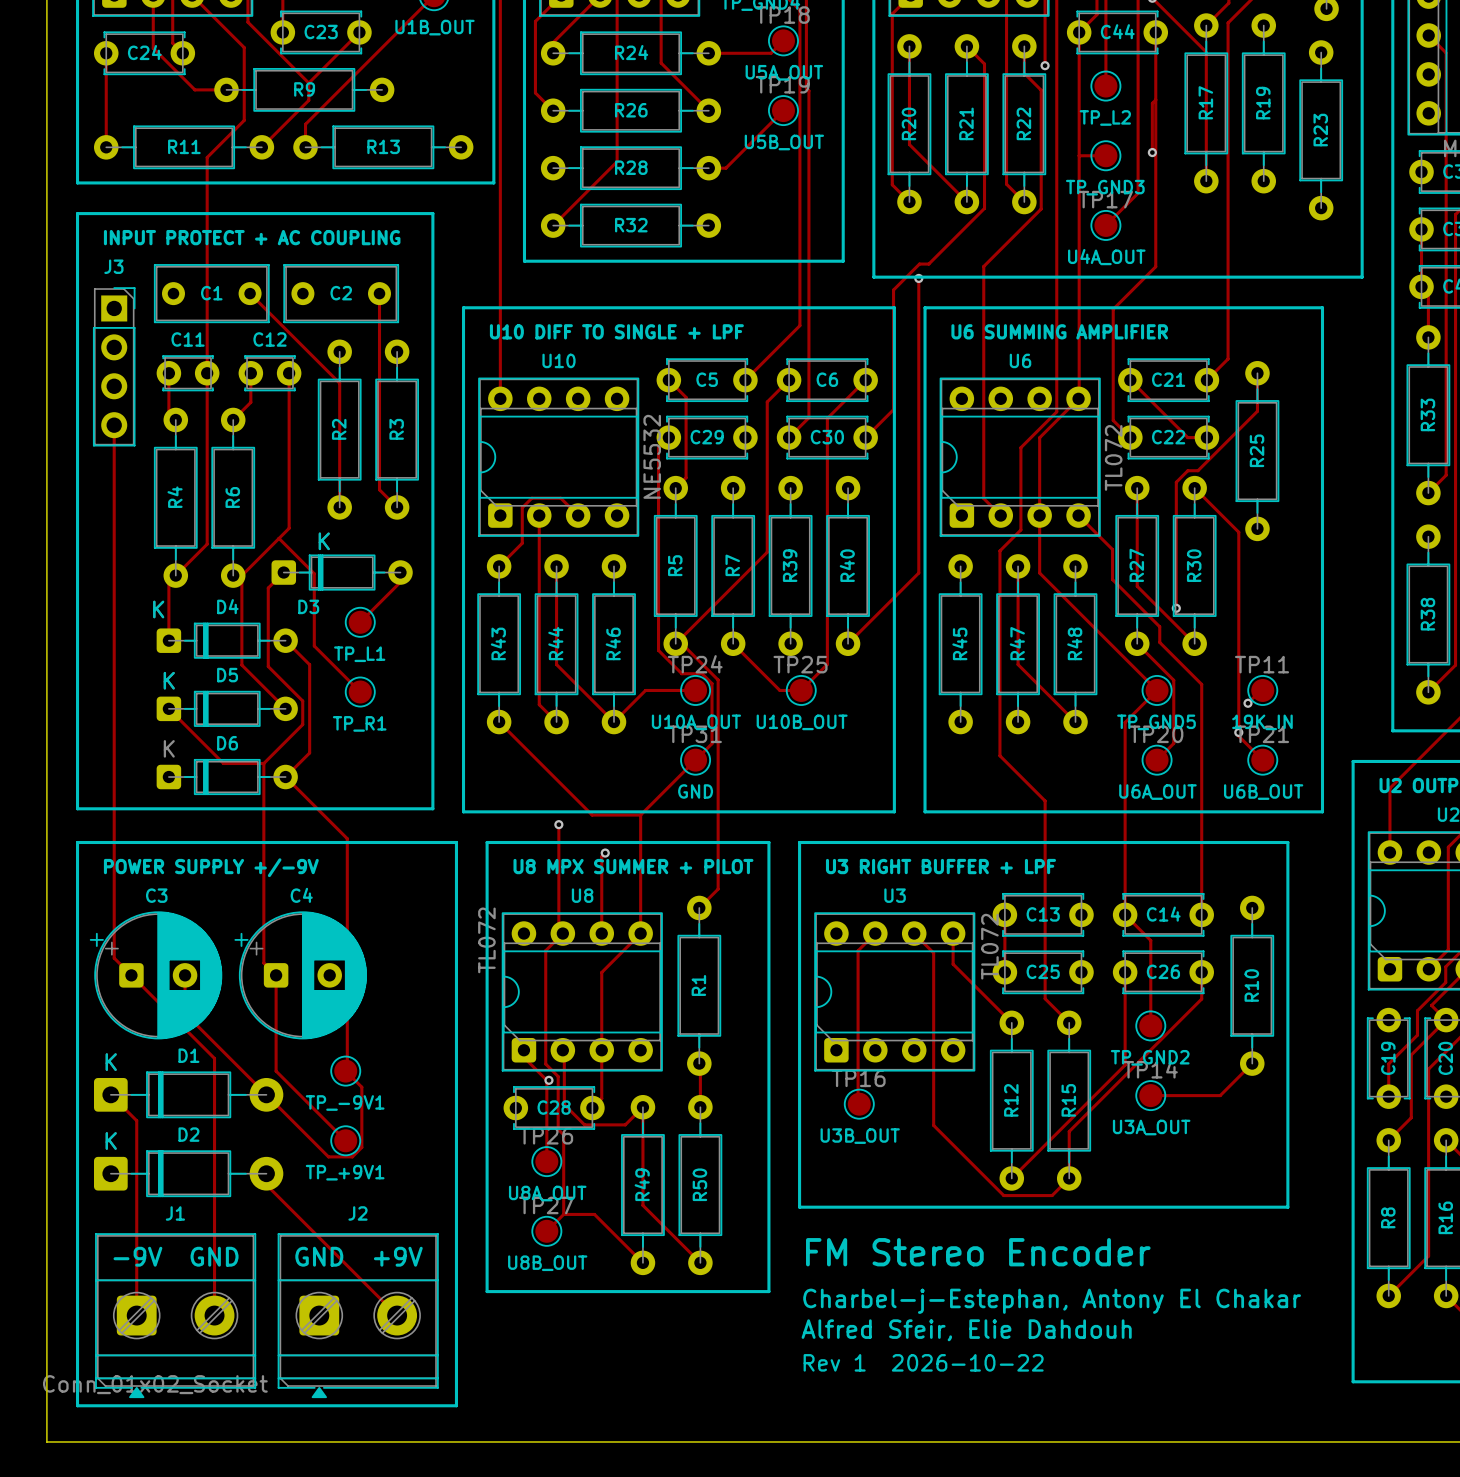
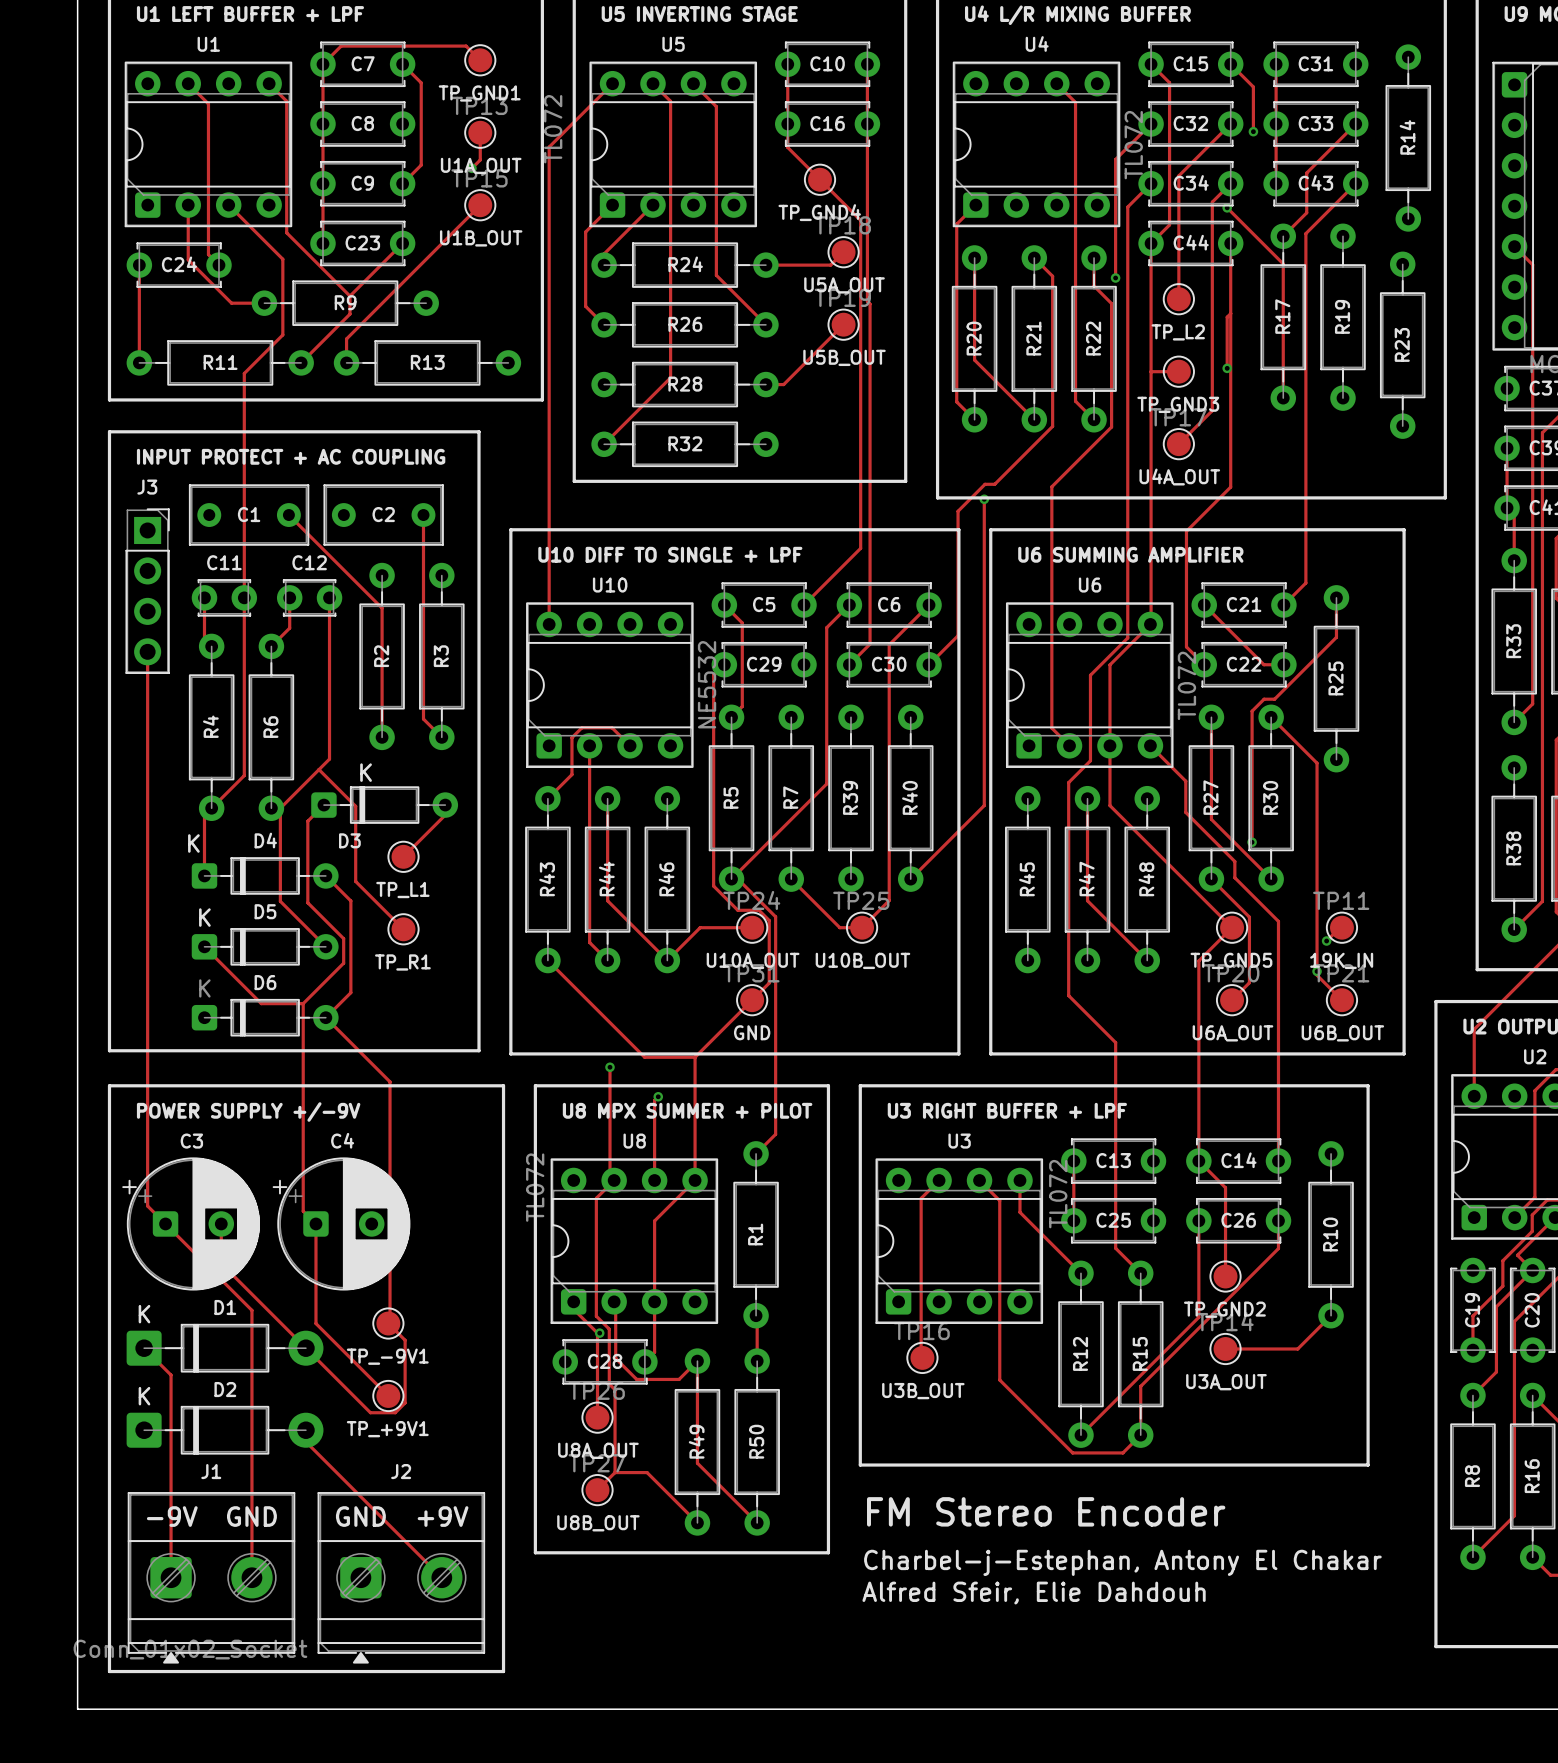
text: Rev 1 2026-10-22 (923, 1362) -> none

